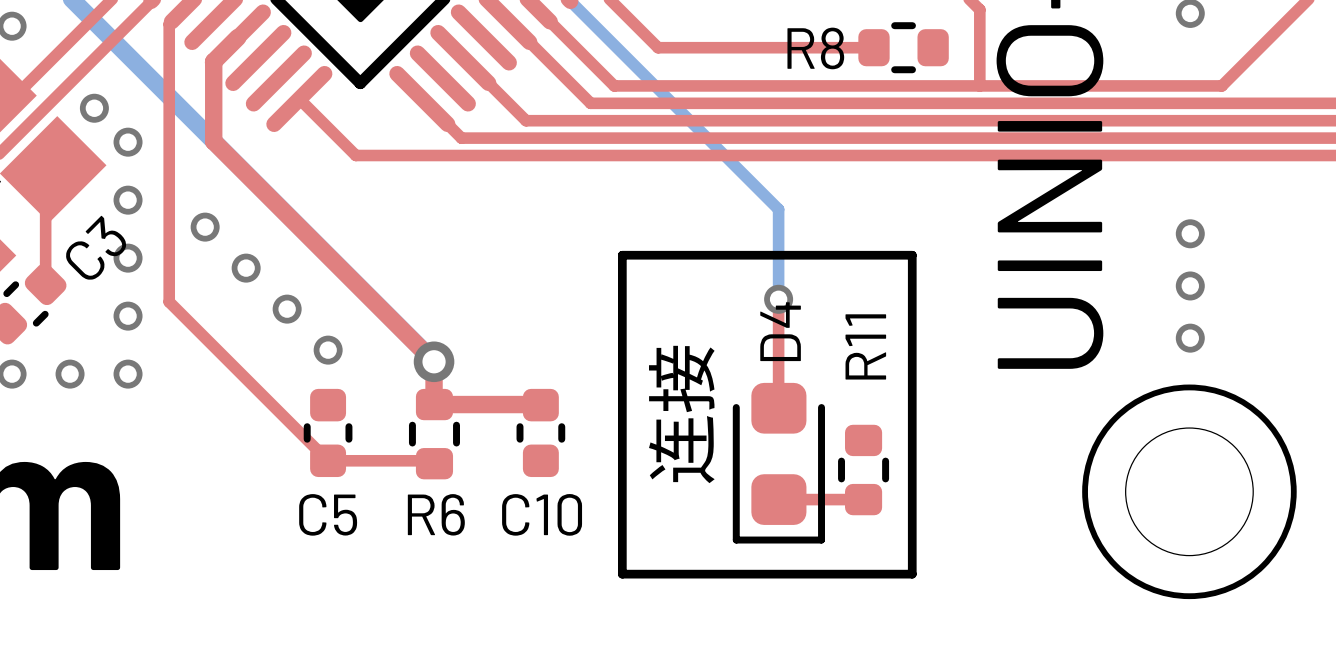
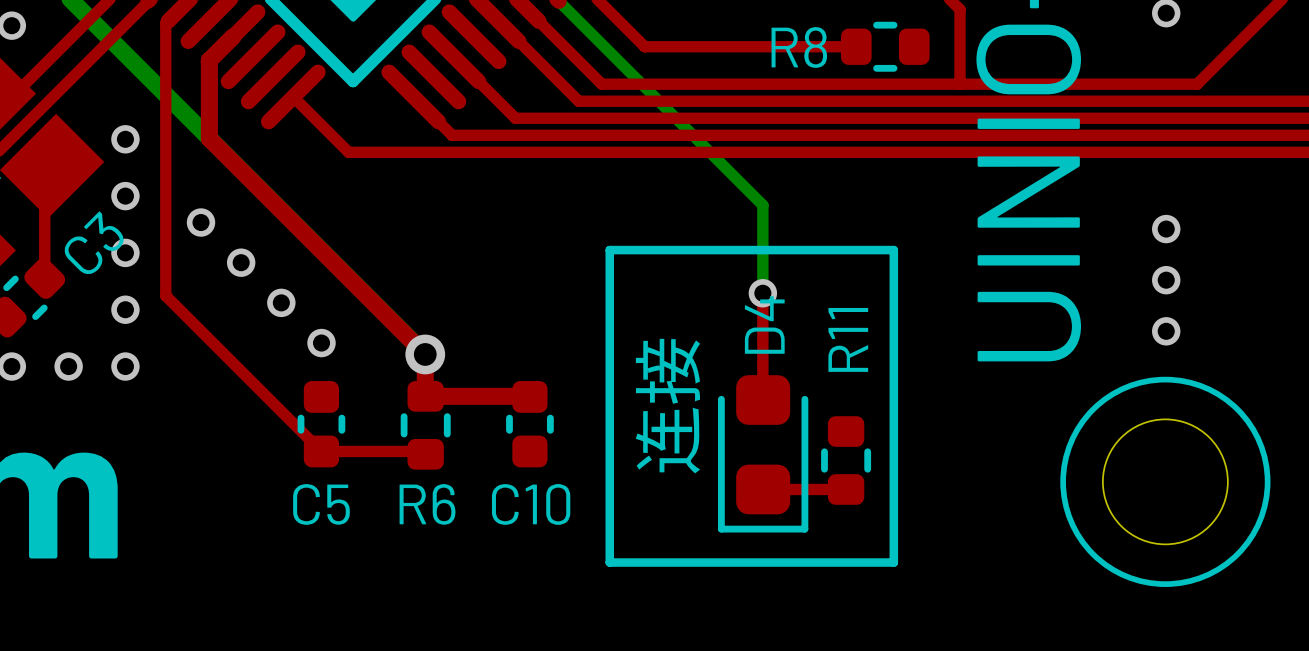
via: (94, 108) -> none

